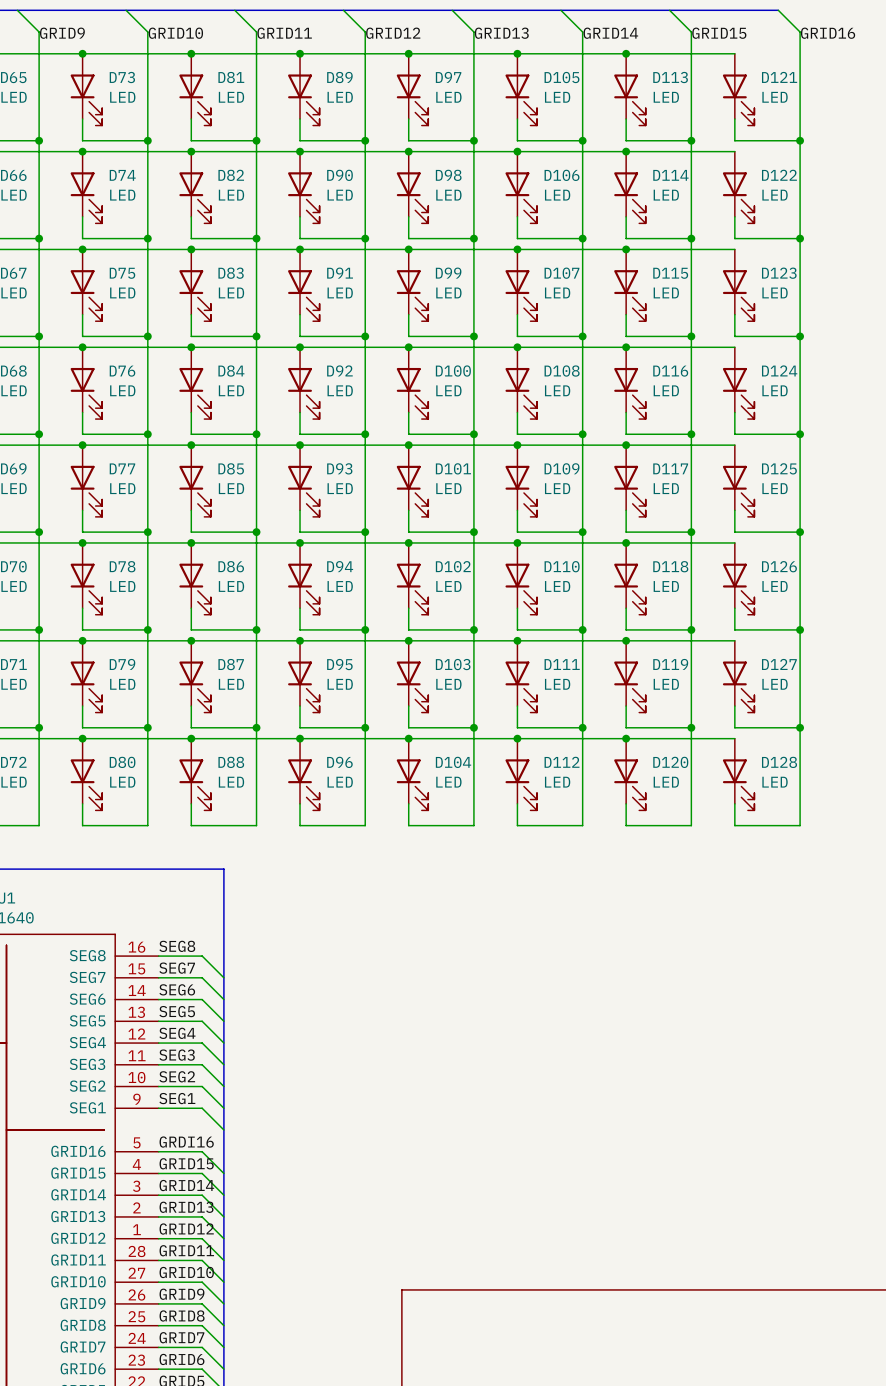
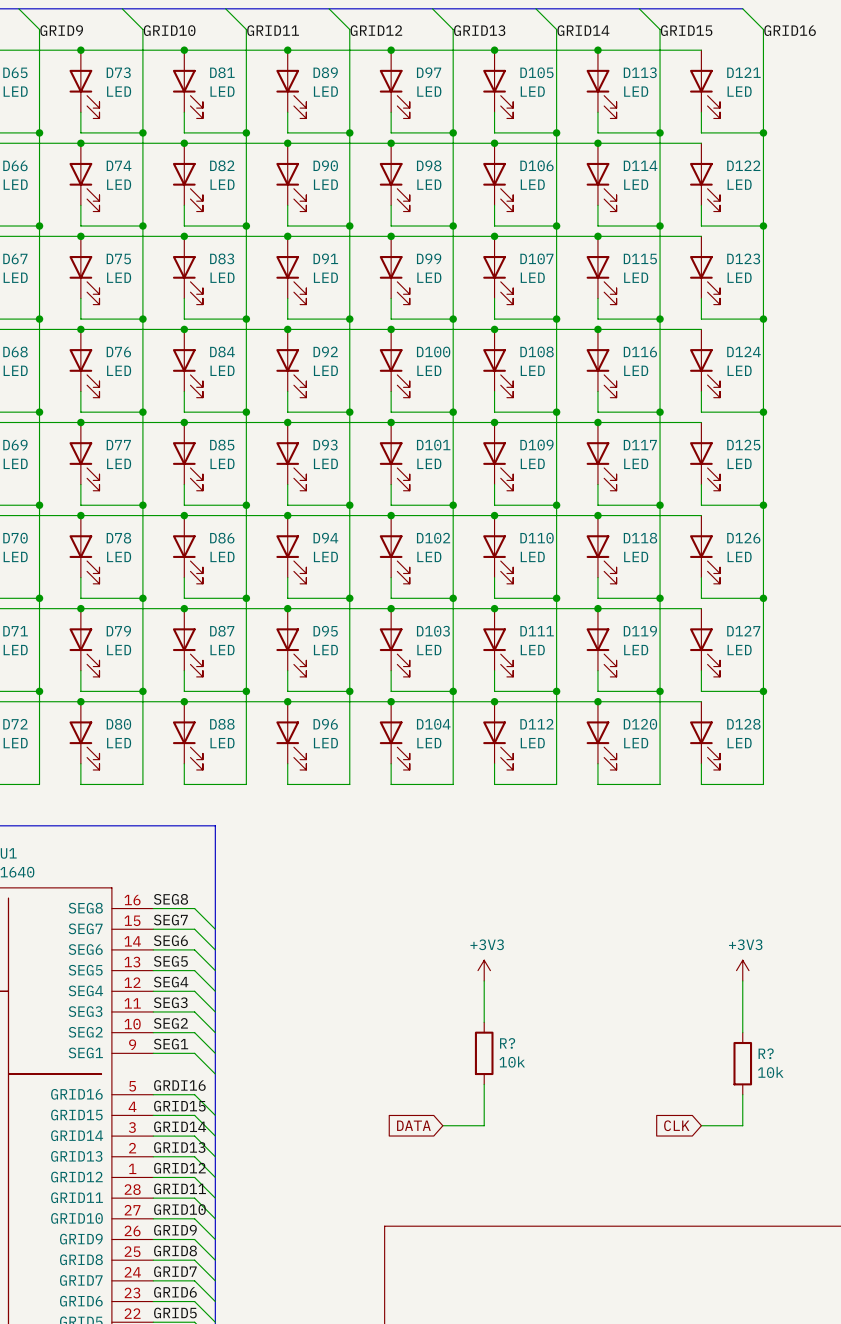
power symbol: none -> +3V3 (484, 970)
power symbol: none -> +3V3 (742, 970)
wire: none -> (484, 980) (484, 1022)
wire: none -> (742, 980) (742, 1032)
R?: none -> 10k (484, 1053)
R?: none -> 10k (742, 1063)
wire: none -> (484, 1084) (484, 1125) (442, 1125)
wire: none -> (742, 1094) (742, 1125) (701, 1125)
global label: none -> DATA (413, 1125)
global label: none -> CLK (676, 1125)

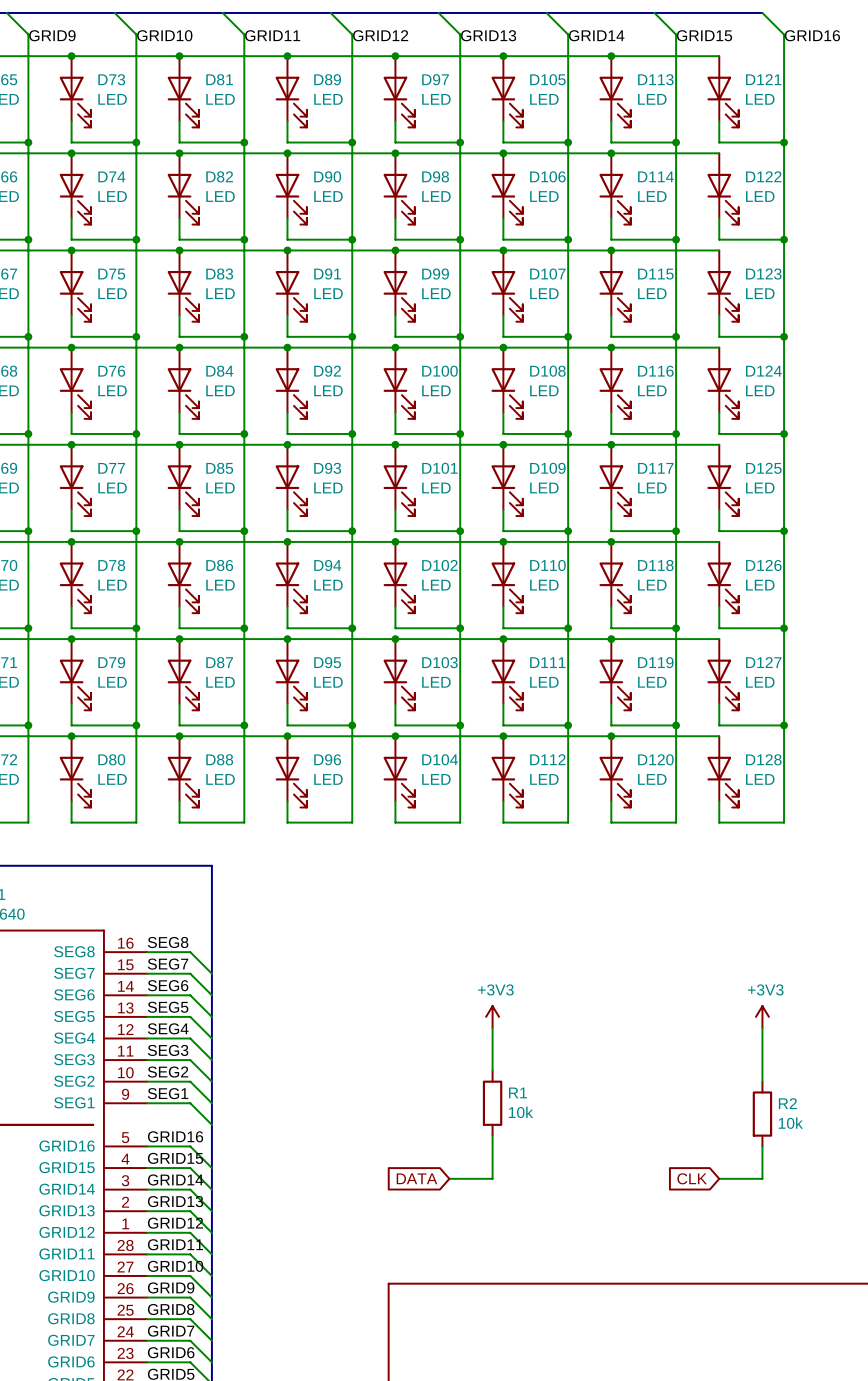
R? name: R? (507, 1043) -> R1 (517, 1092)
R? name: R? (766, 1053) -> R2 (787, 1103)
label: GRDI16 (179, 1085) -> GRID16 (175, 1136)

